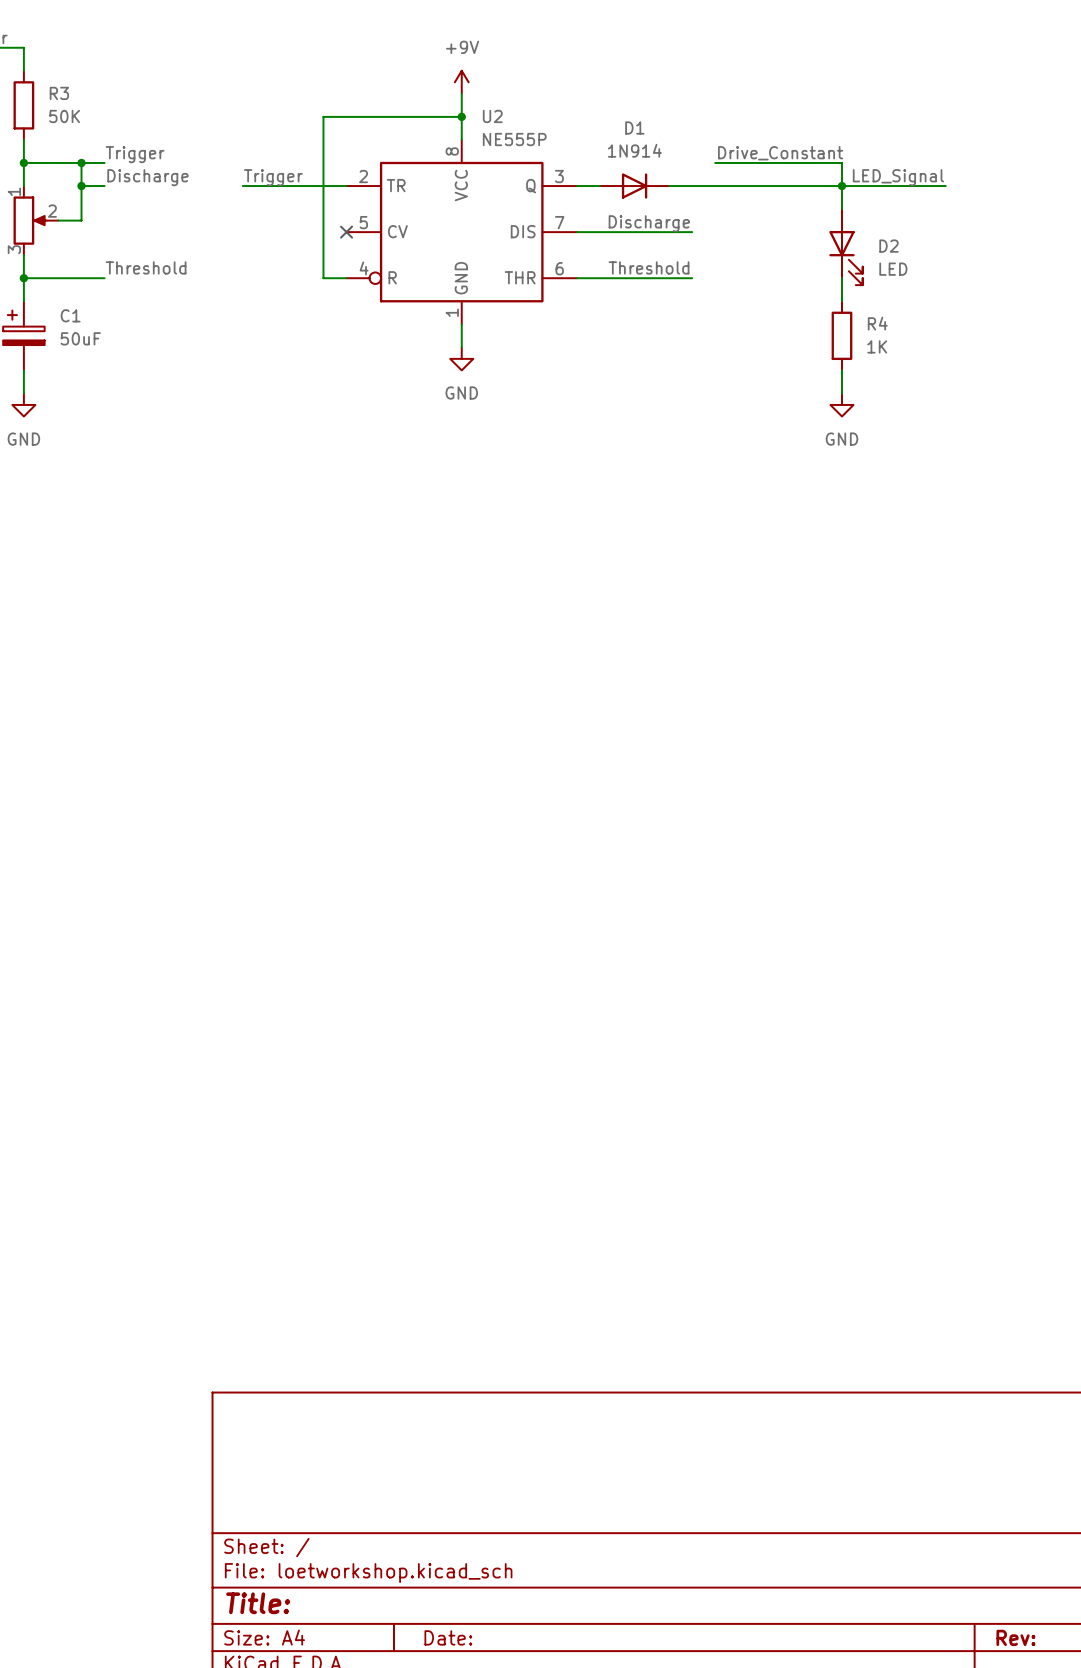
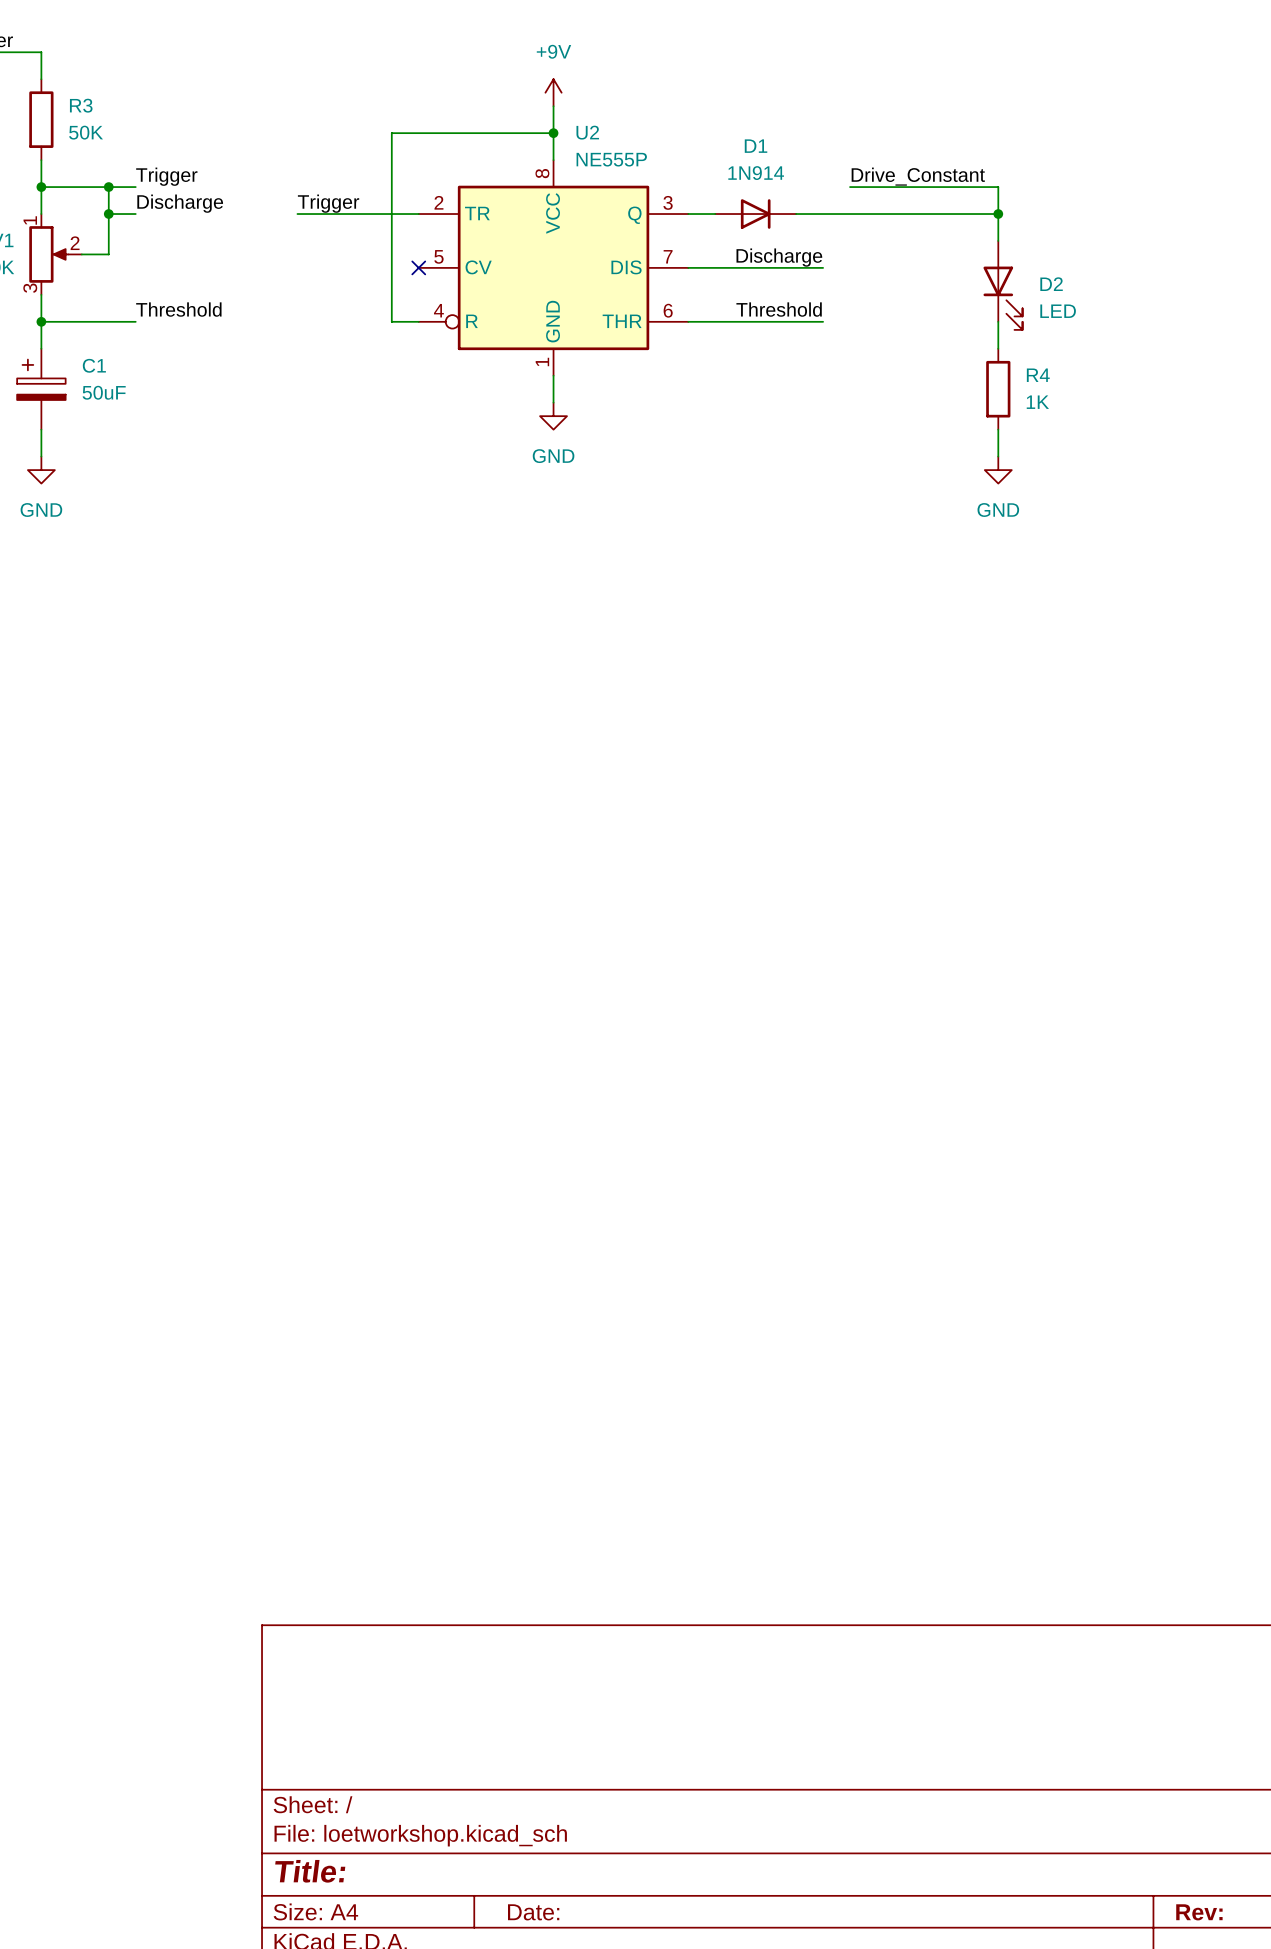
label: LED_Signal (898, 177) -> none
wire: (841, 186) (945, 186) -> none

